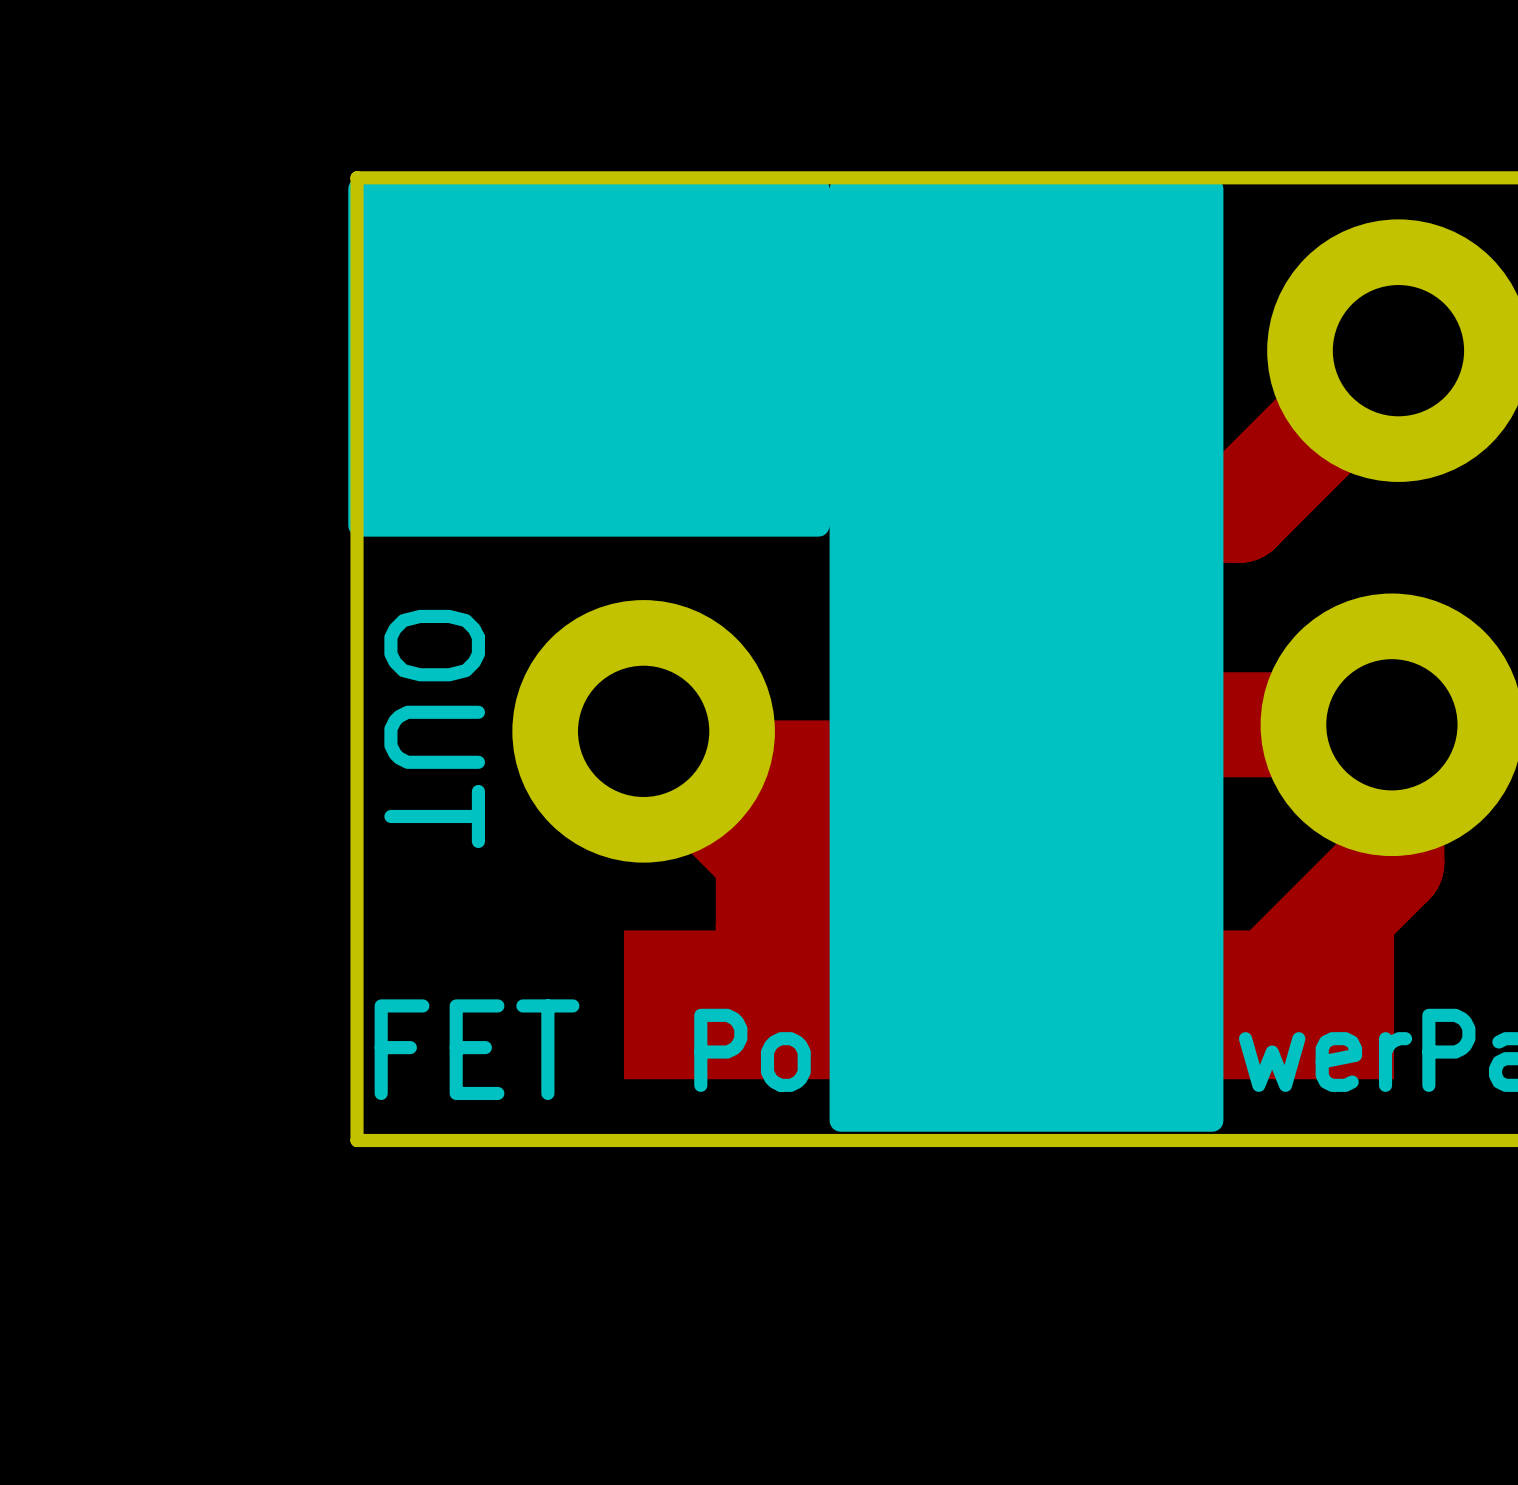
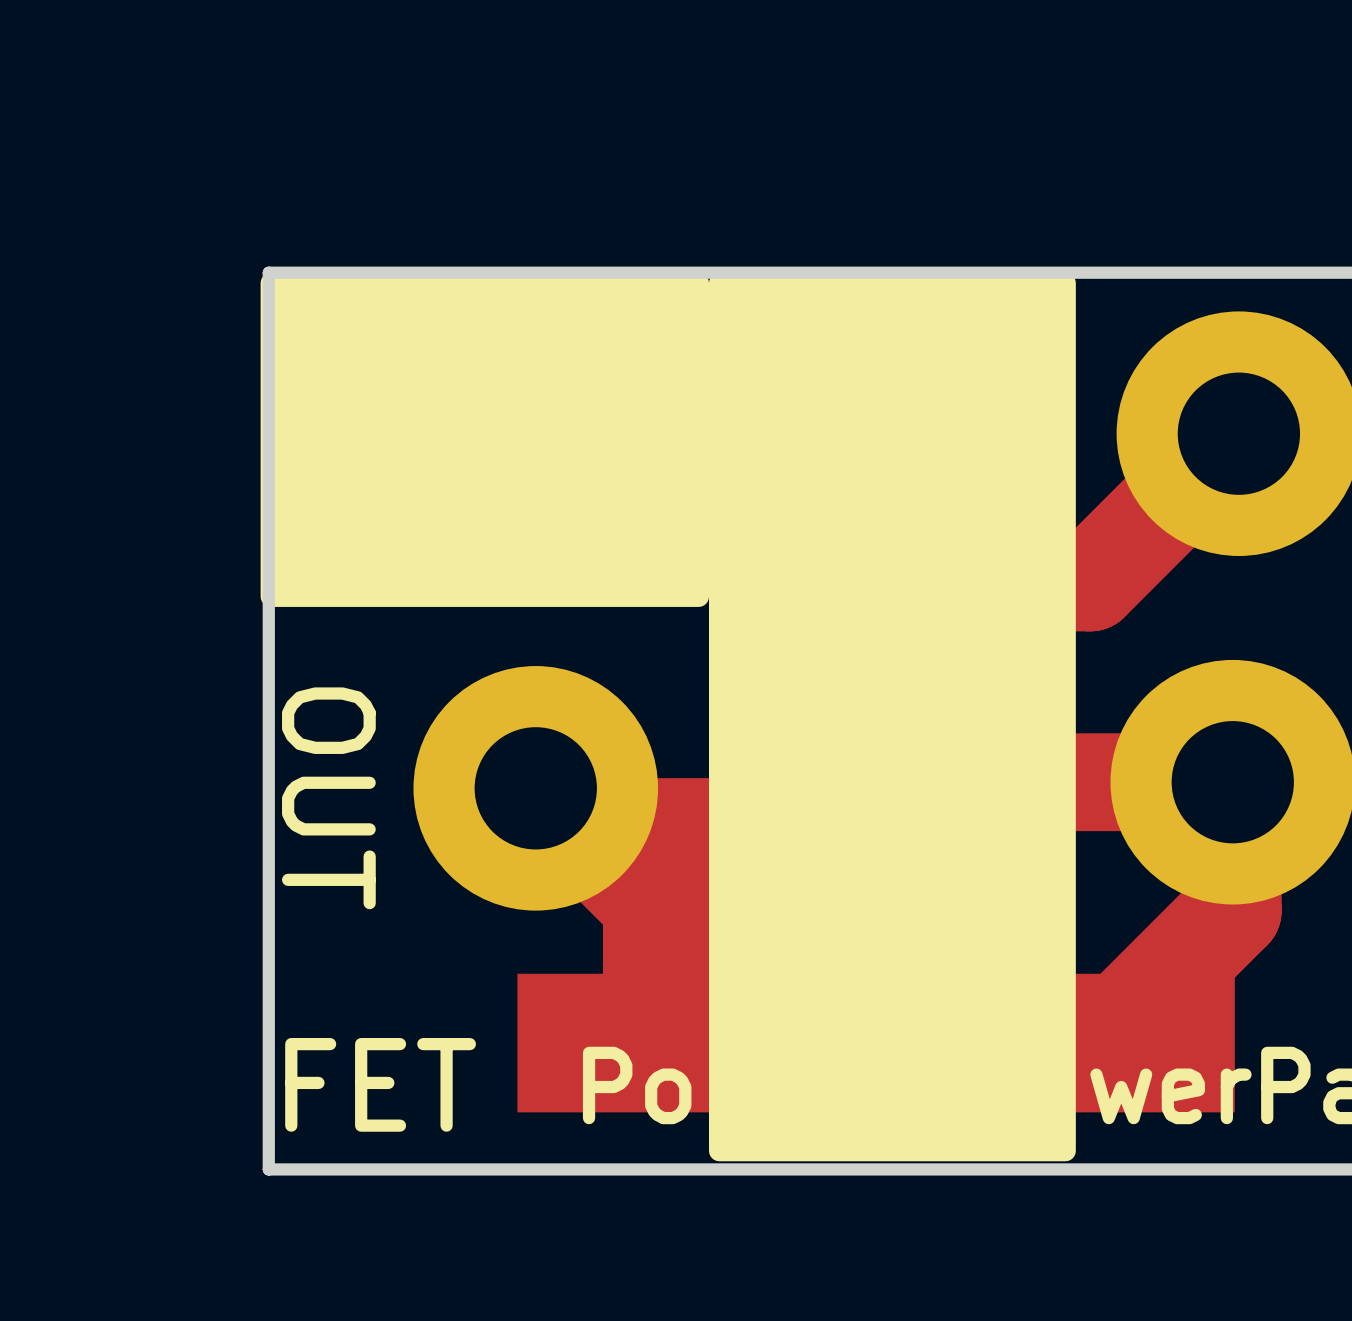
text position: OUT (434, 728) -> OUT (328, 798)

